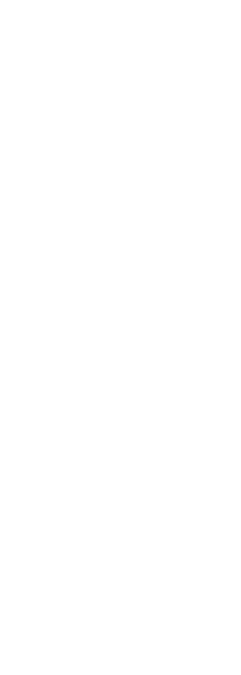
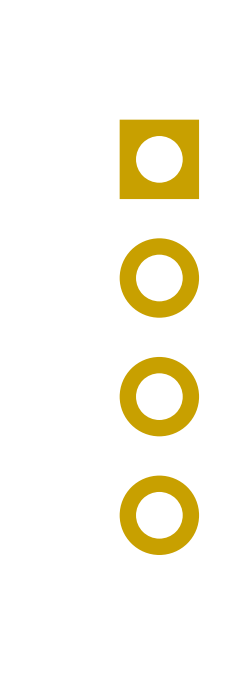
part: none -> (159, 337)

